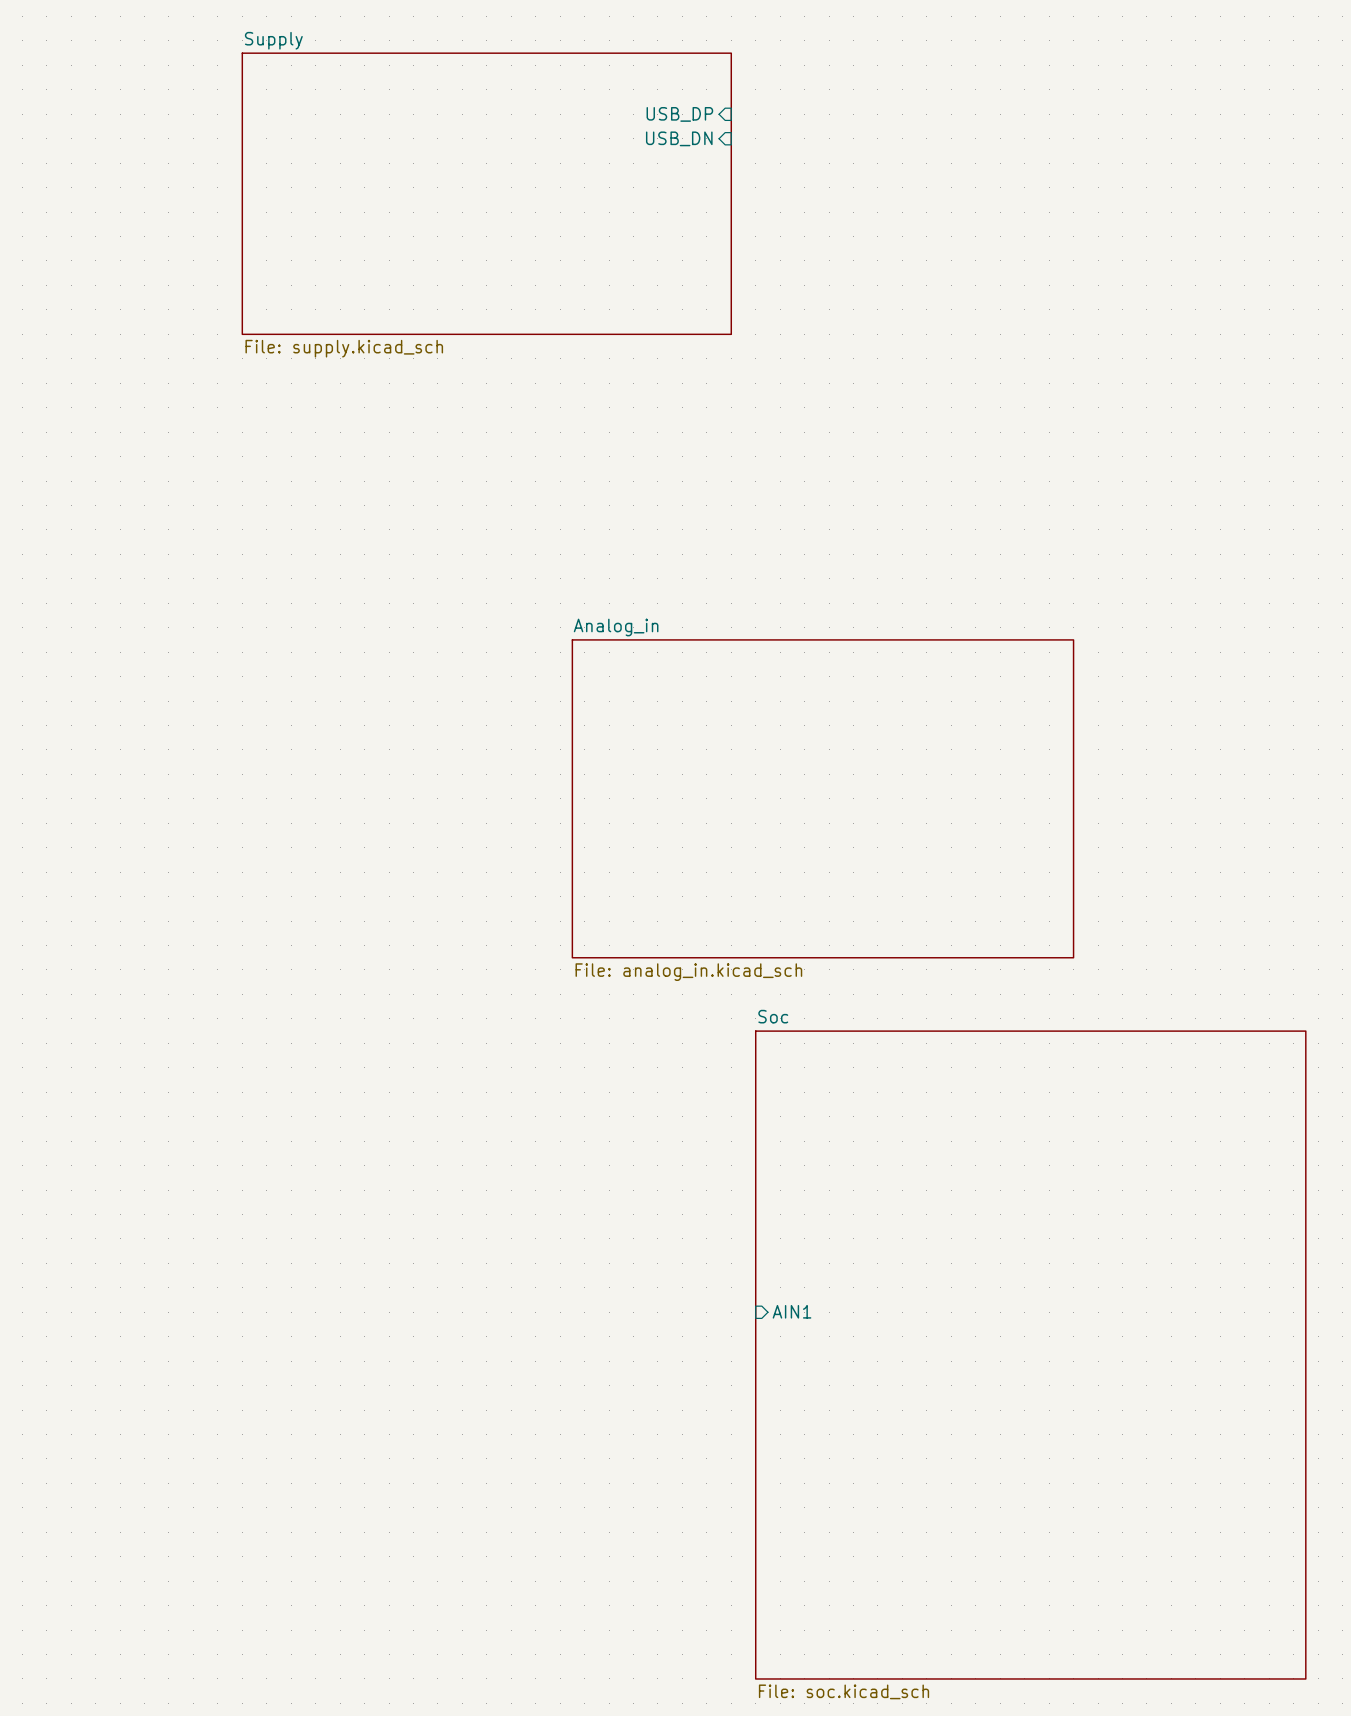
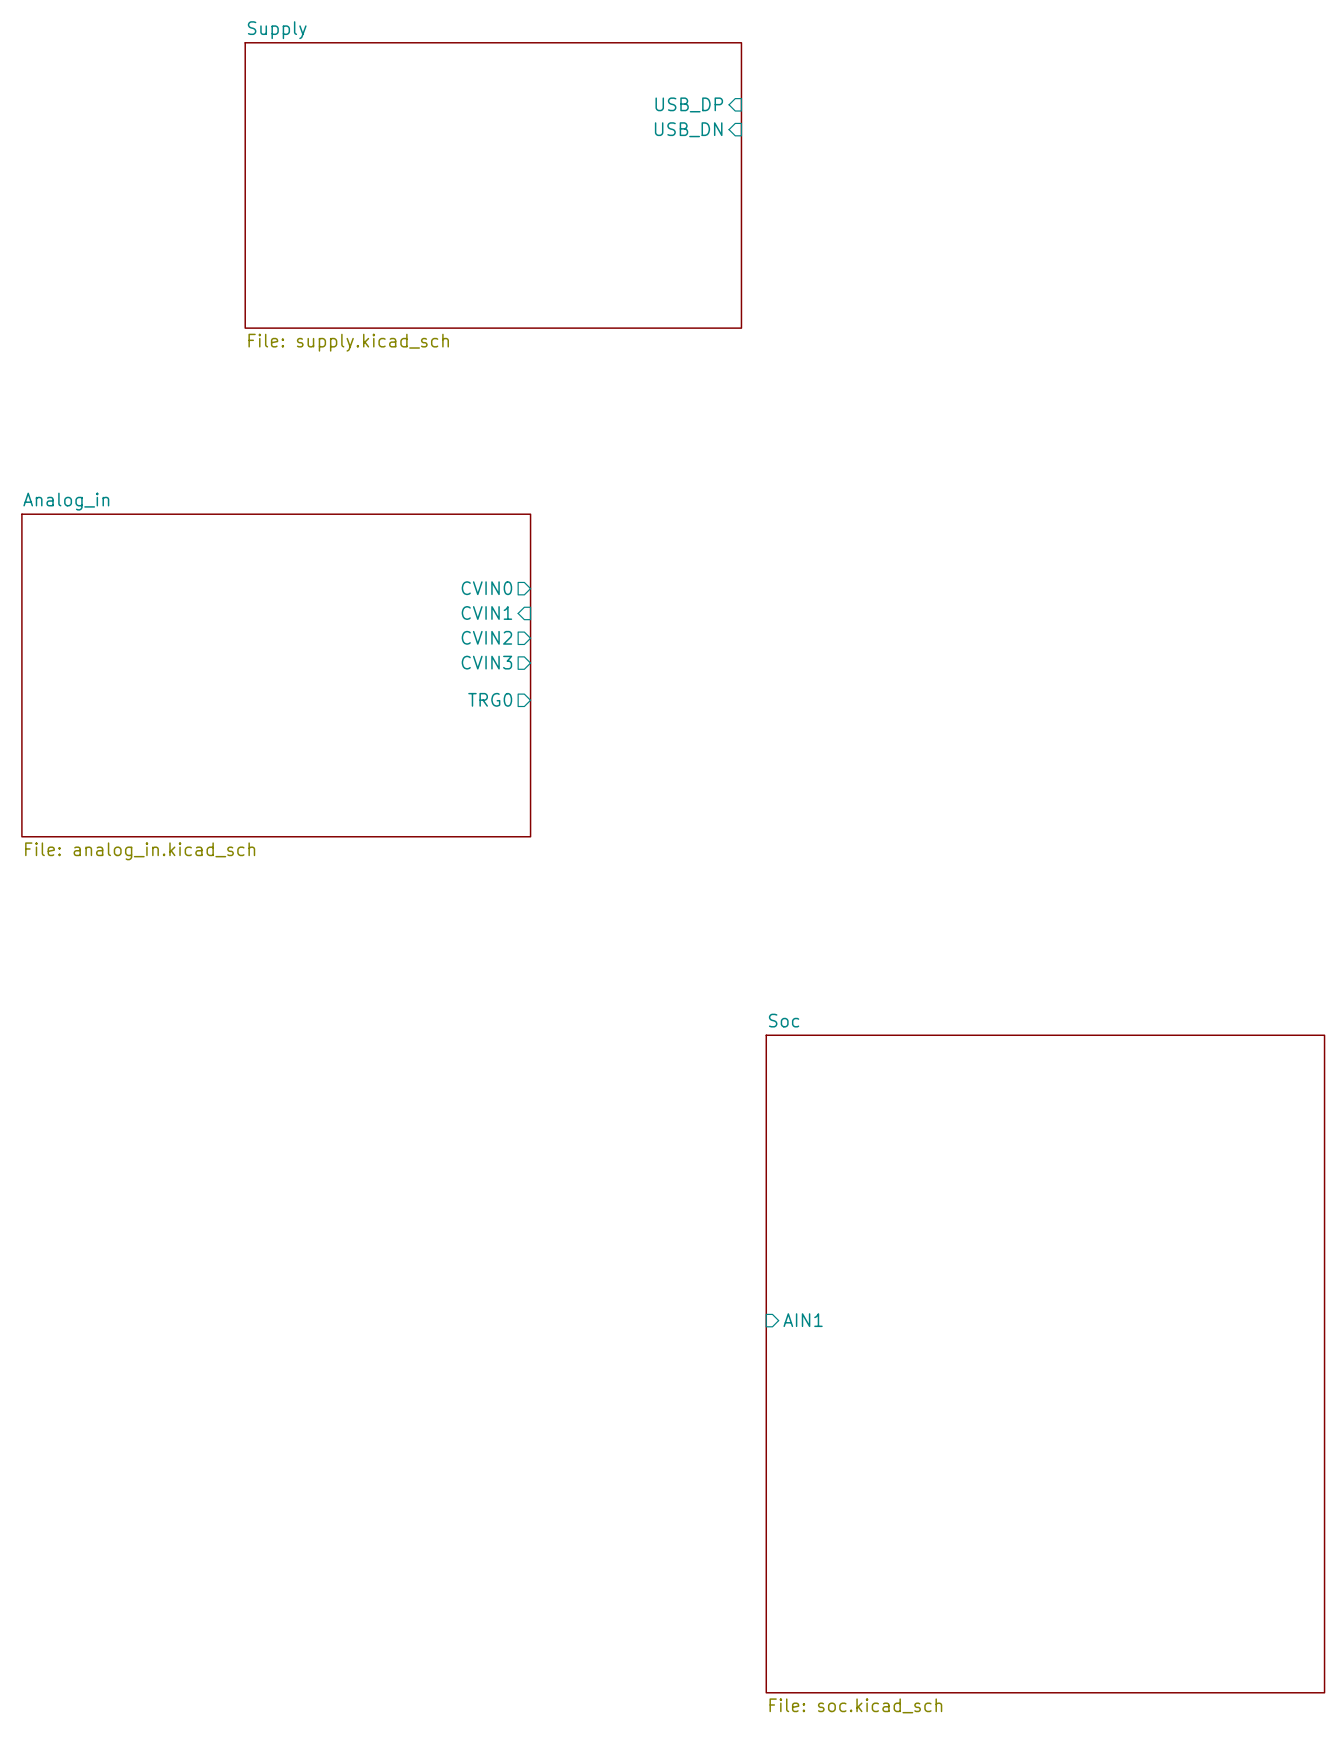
sheet pin: none -> CVIN0 (486, 588)
sheet pin: none -> CVIN1 (486, 612)
sheet pin: none -> CVIN2 (486, 637)
sheet pin: none -> CVIN3 (486, 662)
sheet Analog_in: none -> File: analog_in.kicad_sch (276, 675)
sheet pin: none -> TRG0 (490, 699)
sheet Analog_in: File: analog_in.kicad_sch (822, 798) -> none

